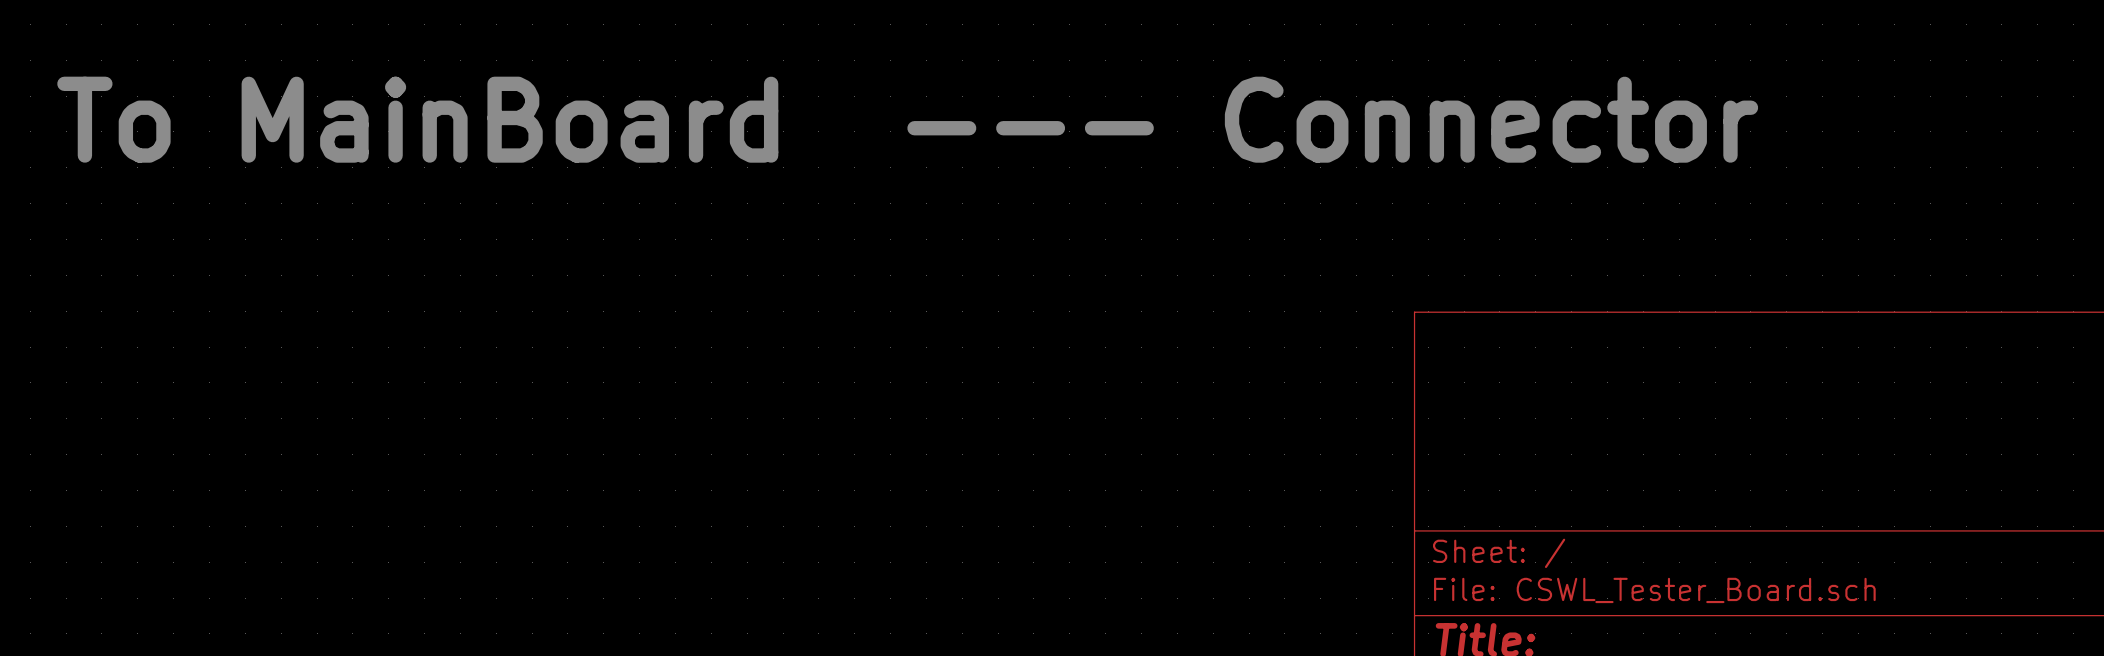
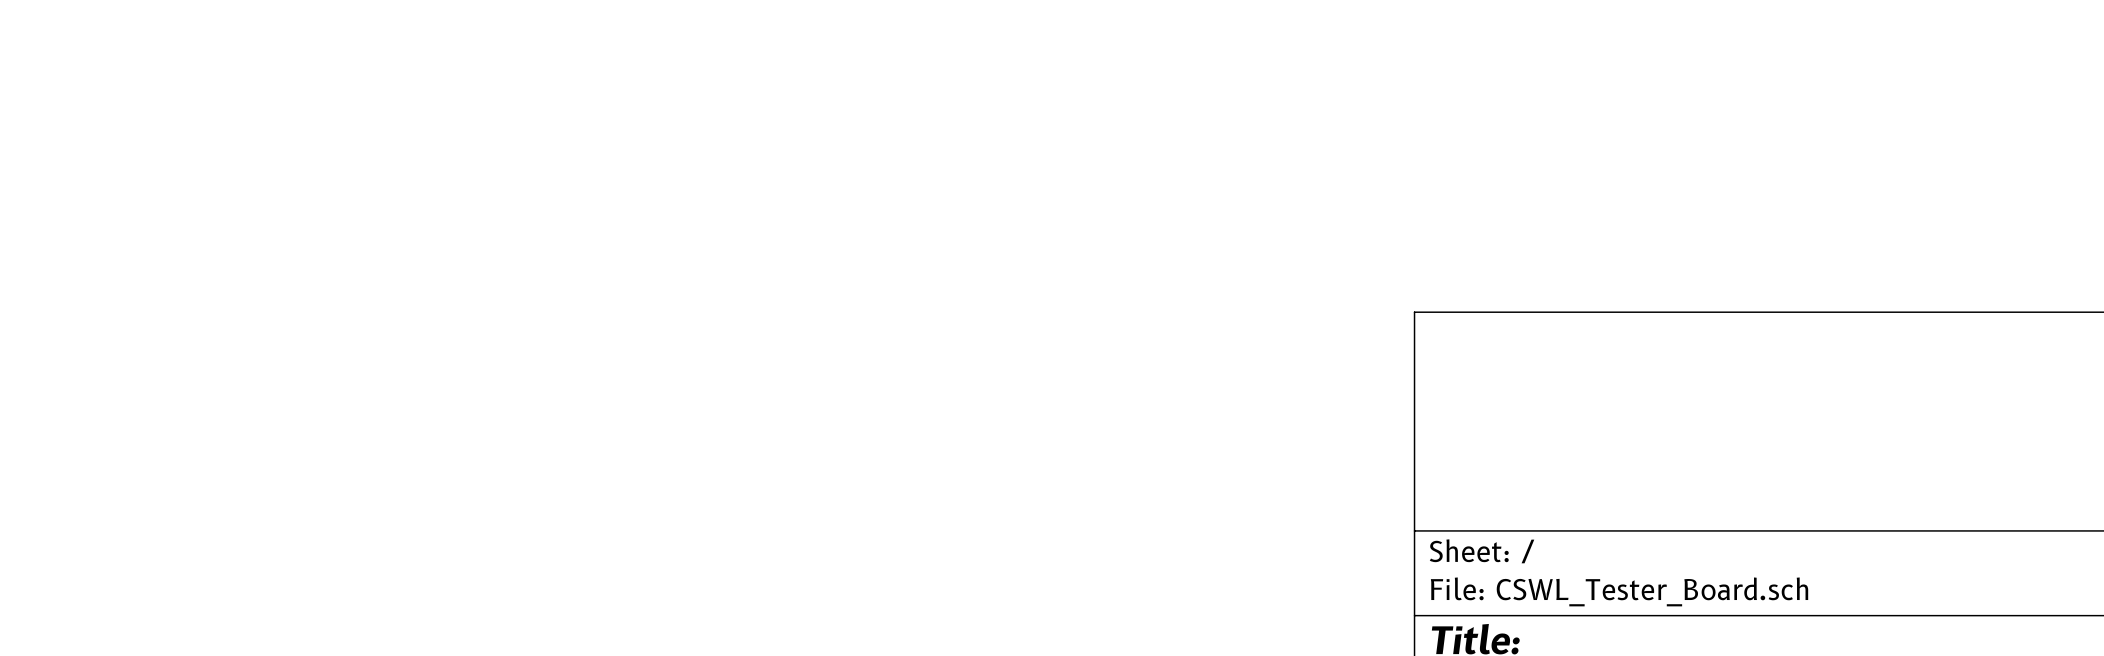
text: To MainBoard --- Connector (907, 119) -> none

